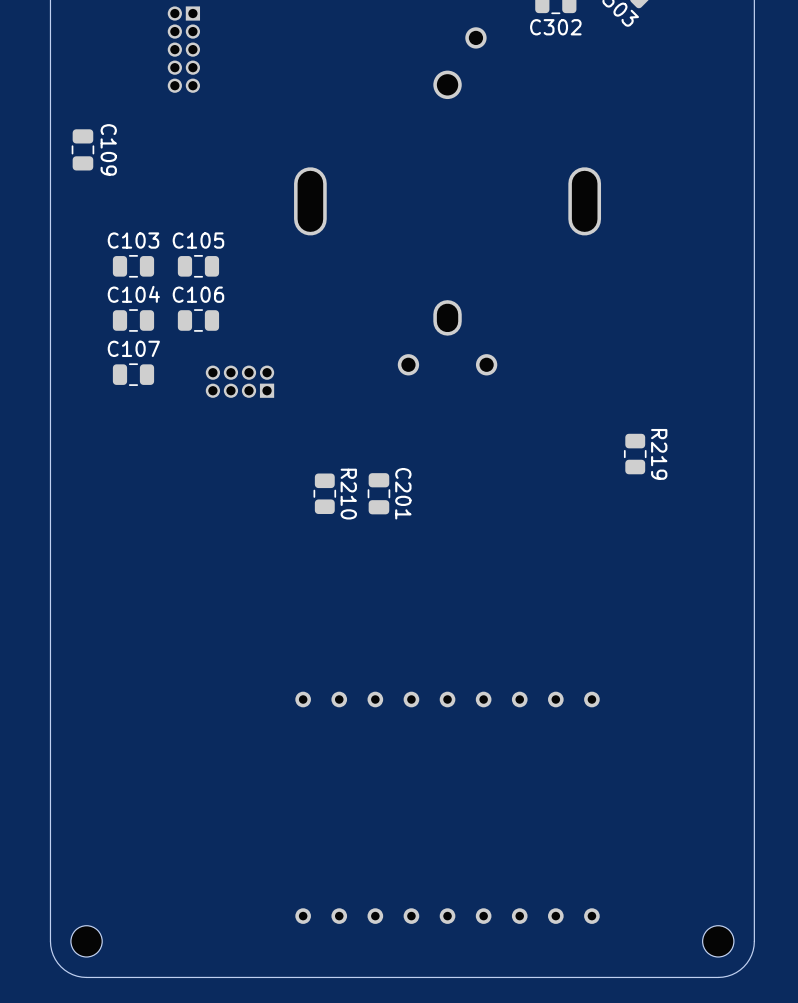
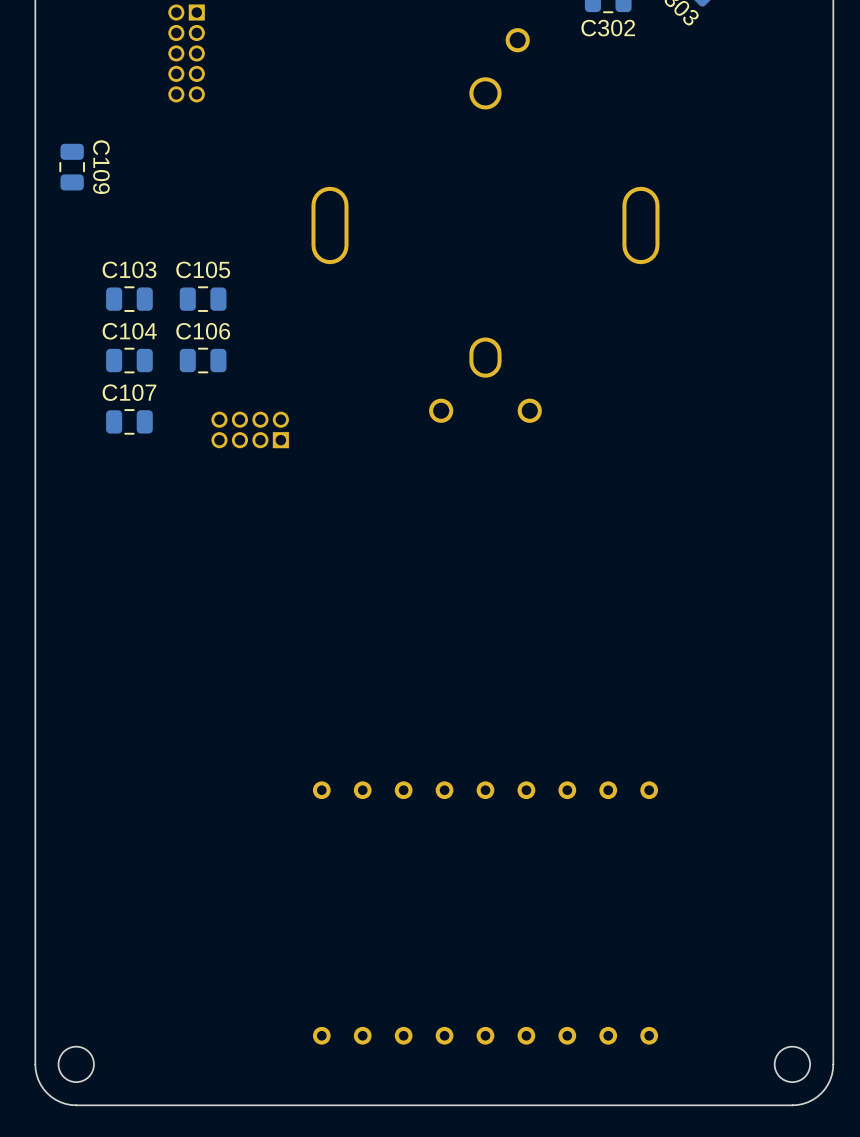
R219: (635, 454) -> none
R210: (324, 493) -> none
C201: (378, 493) -> none

